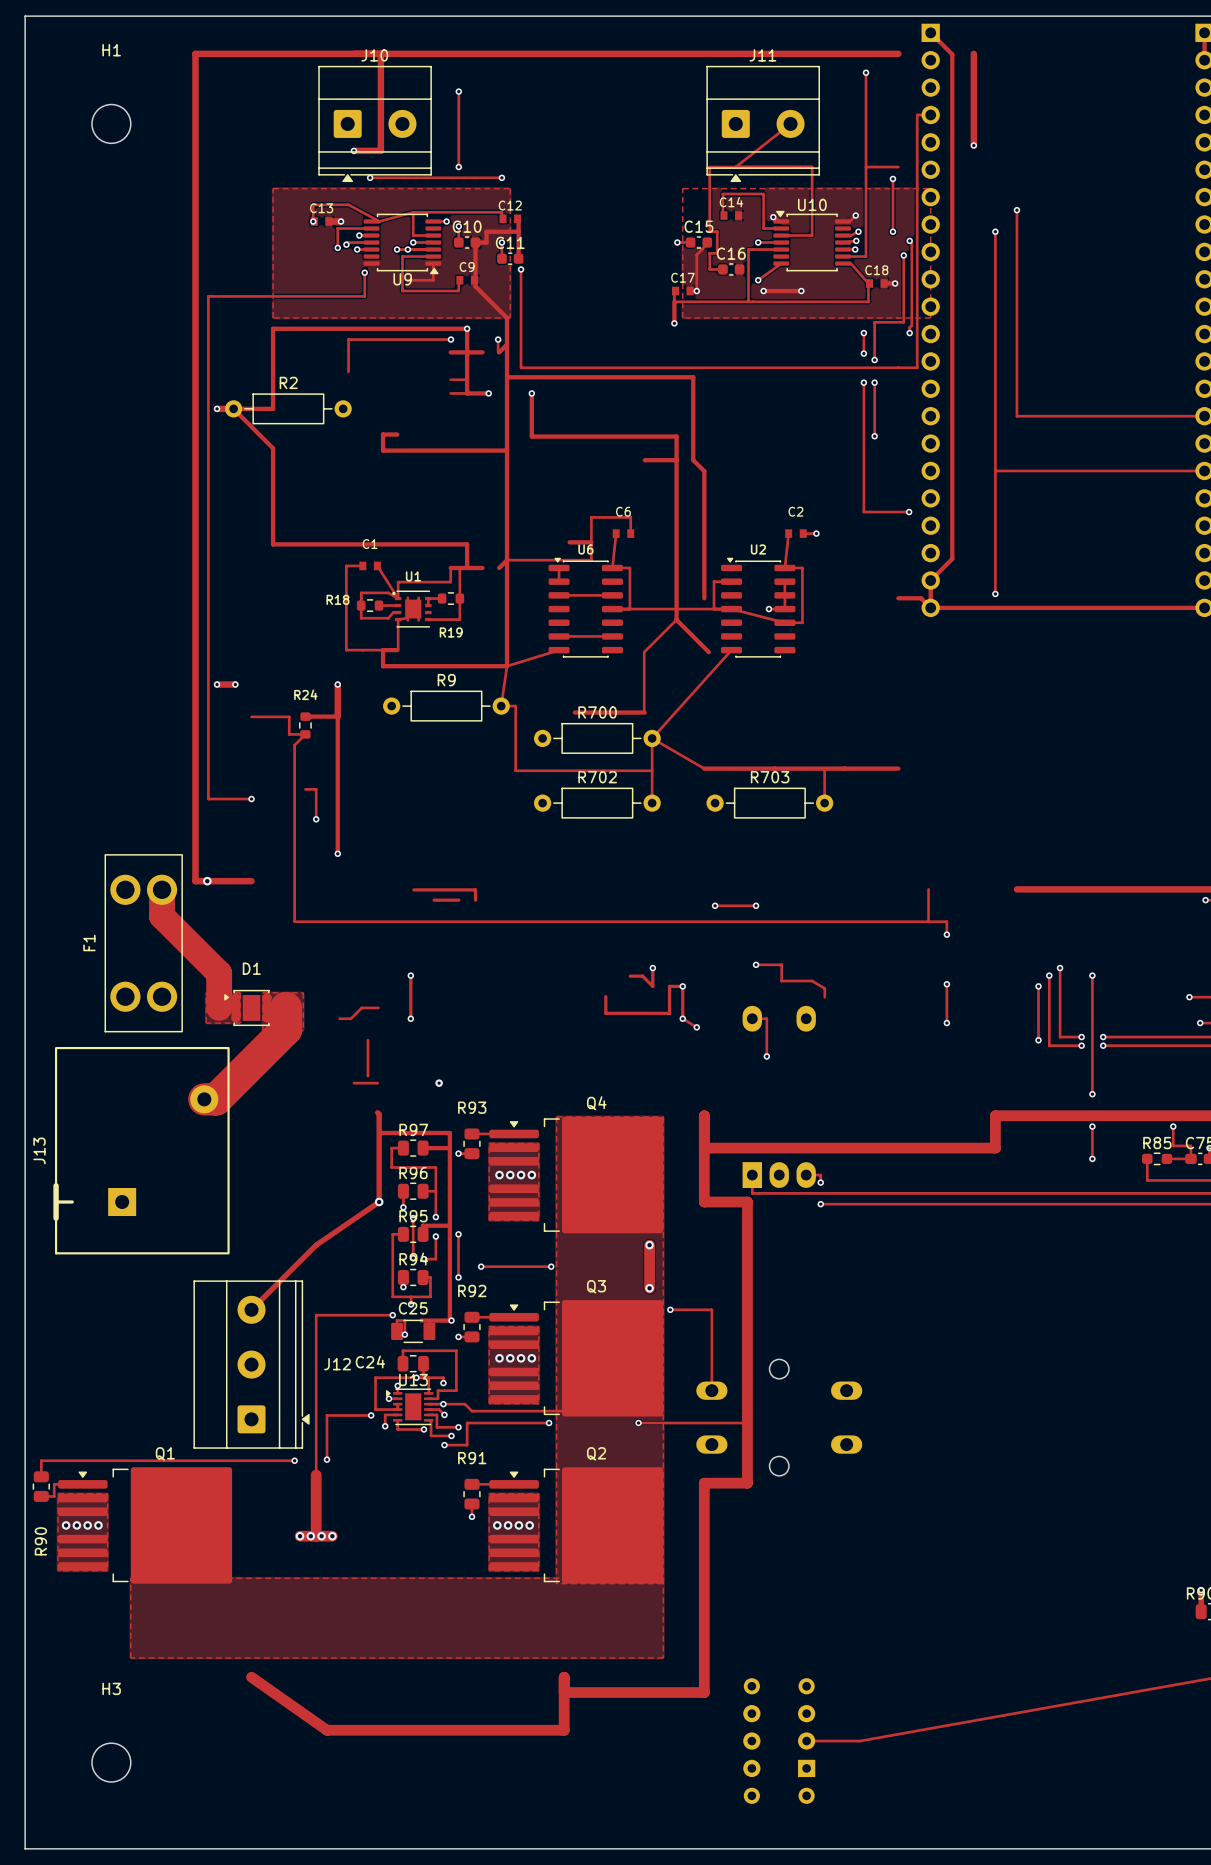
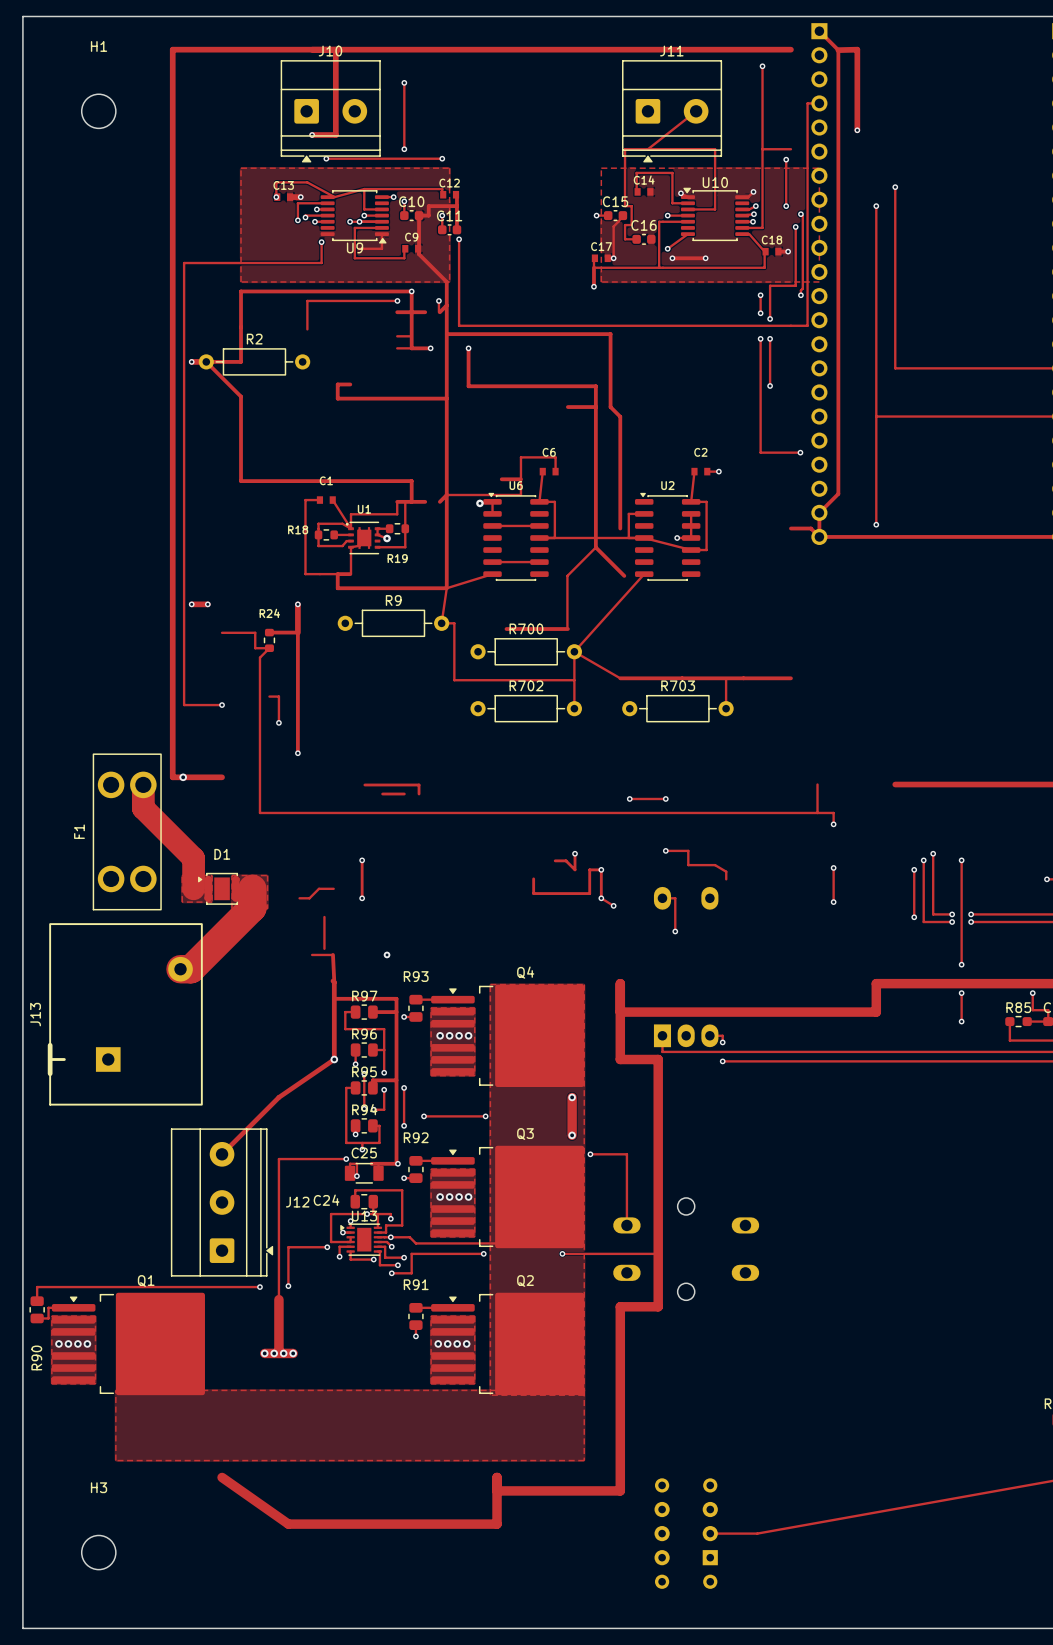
track: none -> (857, 49) (838, 50)
via: none -> (479, 503)
track: none -> (377, 534) (387, 538)
via: none -> (387, 538)
track: none -> (332, 954) (334, 982)

